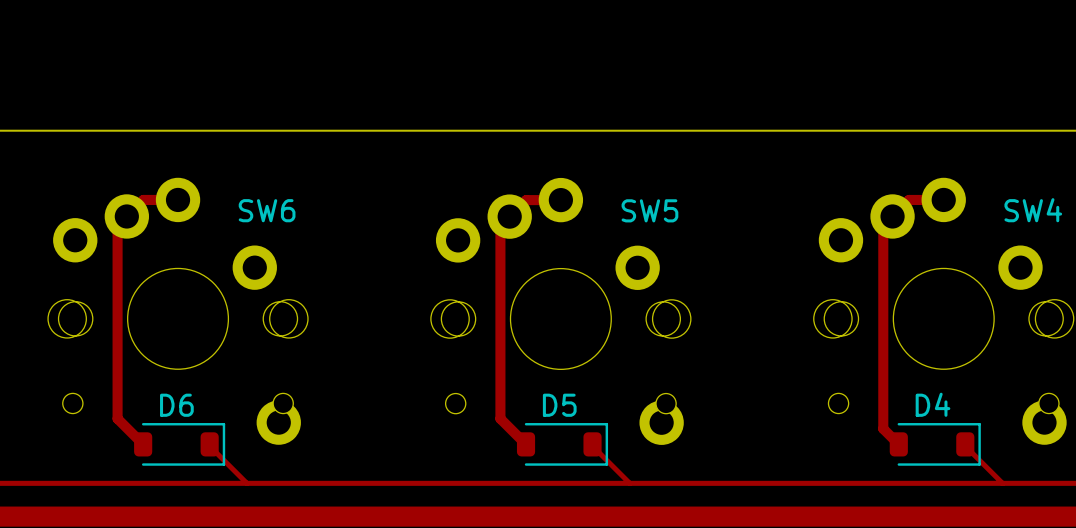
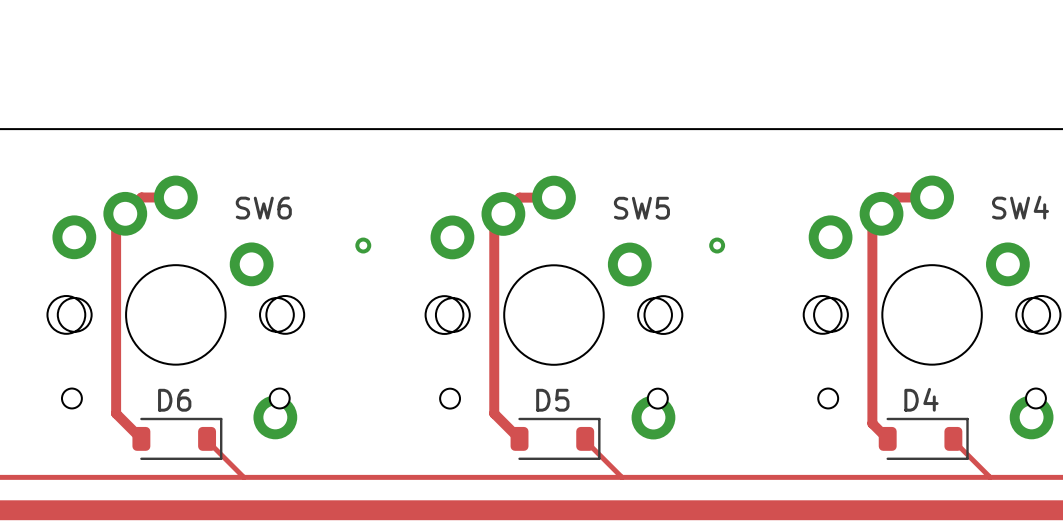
via: none -> (363, 245)
via: none -> (717, 245)

